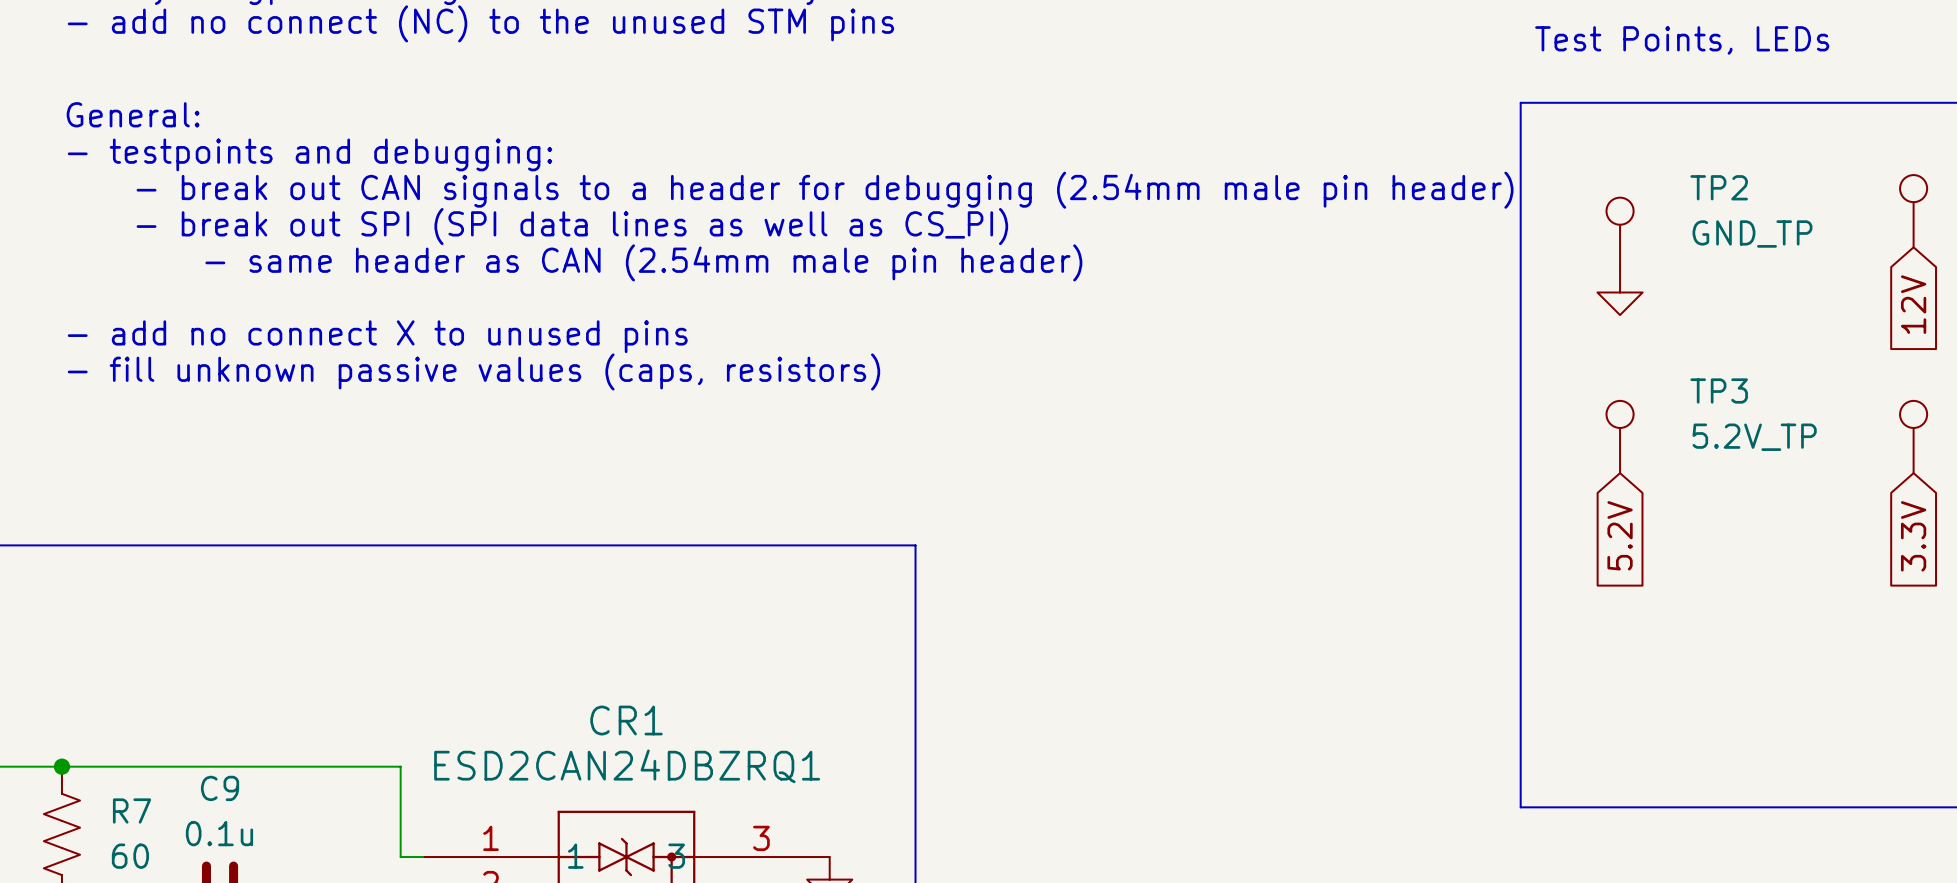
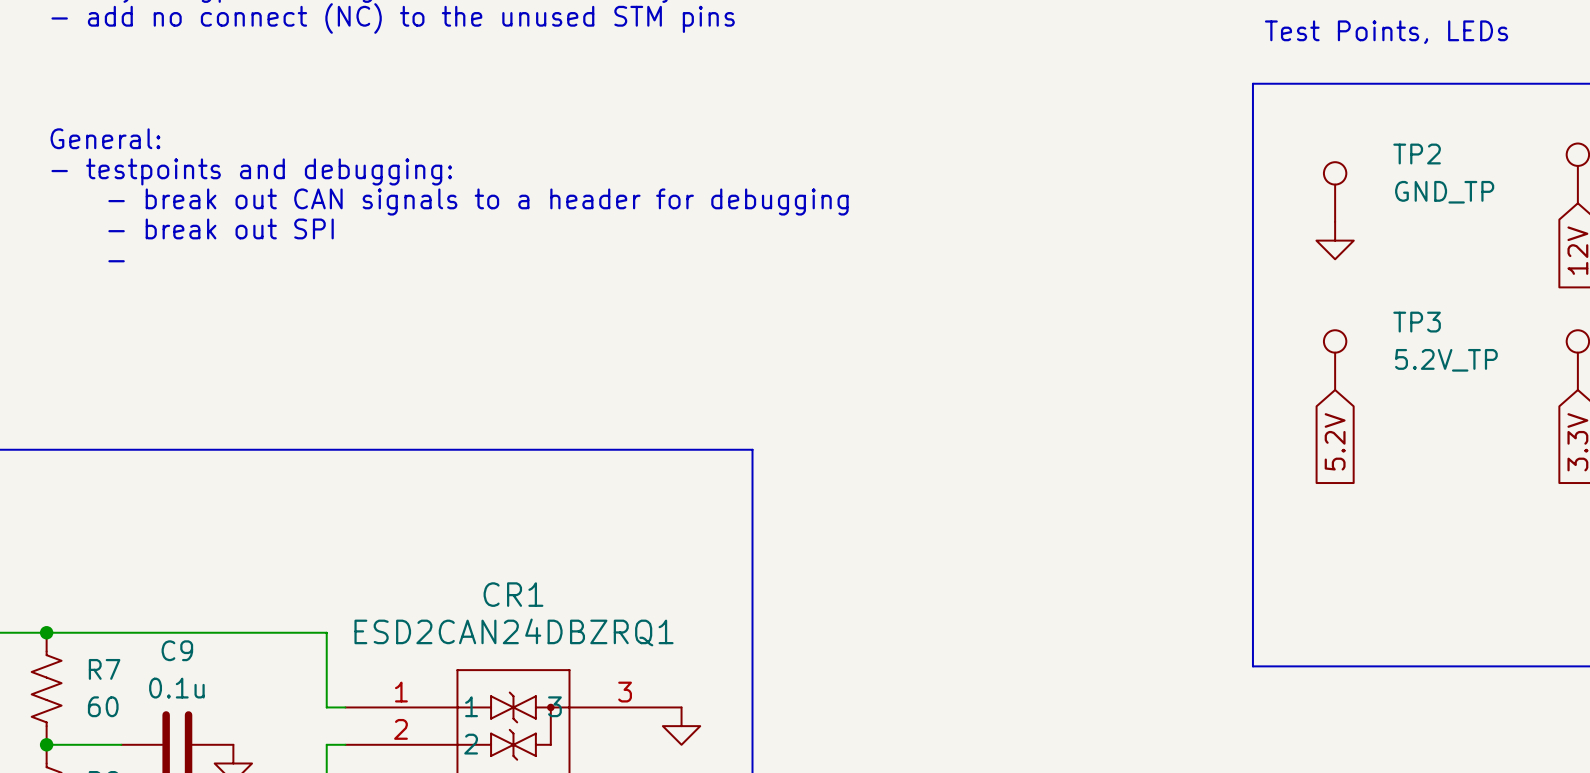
text position: General: (133, 114) -> General: (105, 138)
text position: - testpoints and debugging: (309, 154) -> - testpoints and debugging: (251, 171)
text: - break out CAN signals to a header for debugging (2.54mm male pin header) (825, 190) -> none
text: - break out SPI (SPI data lines as well as CS_PI) (572, 226) -> none
text: none -> - break out CAN signals to a header for debugging (478, 202)
text: - same header as CAN (2.54mm male pin header) (643, 262) -> none
text: none -> - break out SPI (221, 228)
text: none -> - (116, 261)
text: - add no connect X to unused pins (377, 336) -> none
text: - fill unknown passive values (caps, resistors) (473, 371) -> none

